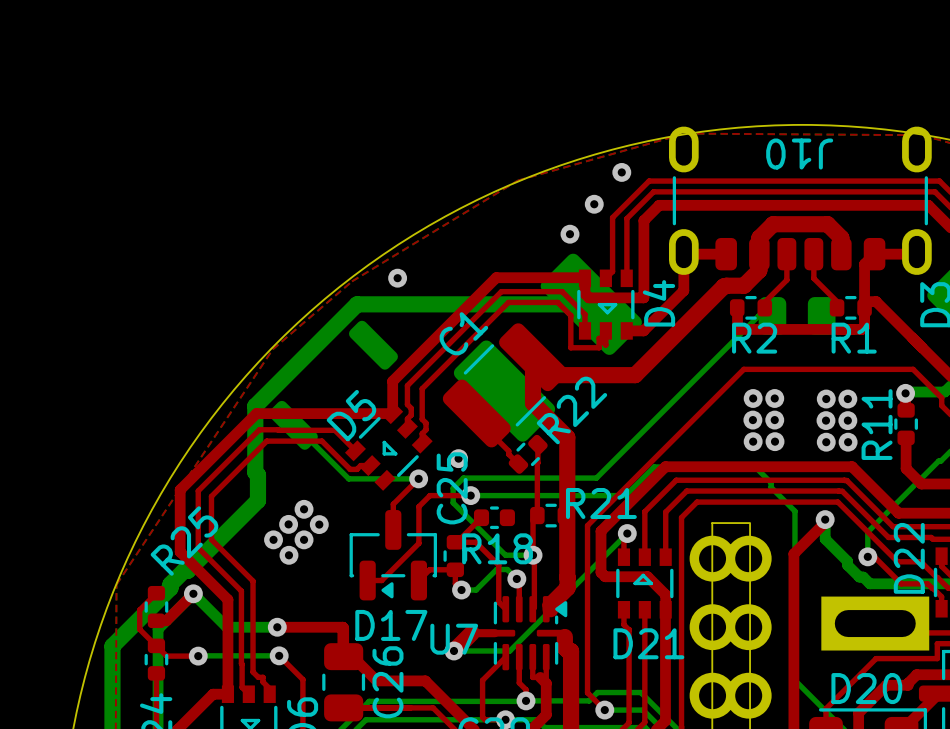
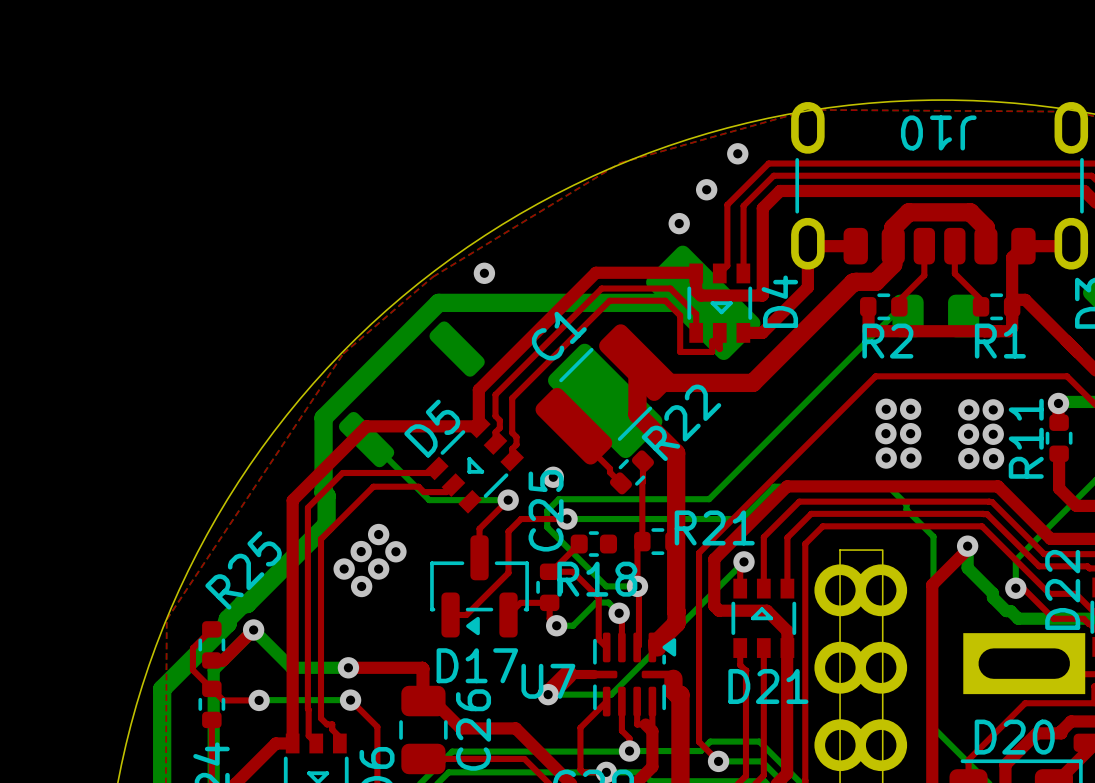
top track: (293, 413) (256, 413) (180, 489) (180, 551) (227, 599) -> (366, 426) (292, 500) (292, 636)
top track: (355, 450) (334, 430) (259, 429) (198, 490) (198, 547) (241, 591) -> (436, 468) (432, 472) (342, 472) (307, 507) (307, 626)
top track: (370, 465) (360, 465) (356, 469) (350, 469) (321, 441) (266, 441) (211, 496) (211, 539) (253, 581) -> (453, 485) (446, 492) (423, 492) (418, 486) (373, 486) (321, 539) (321, 615)

